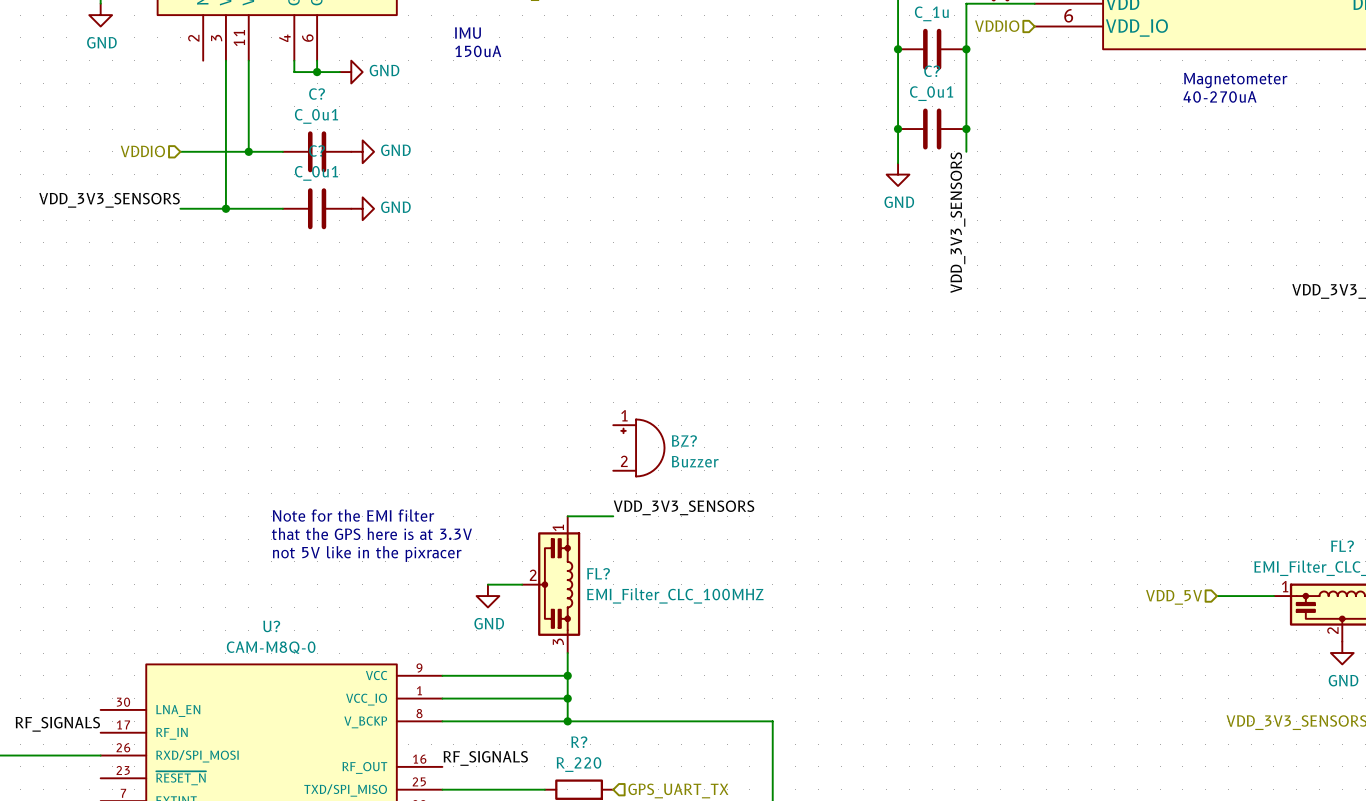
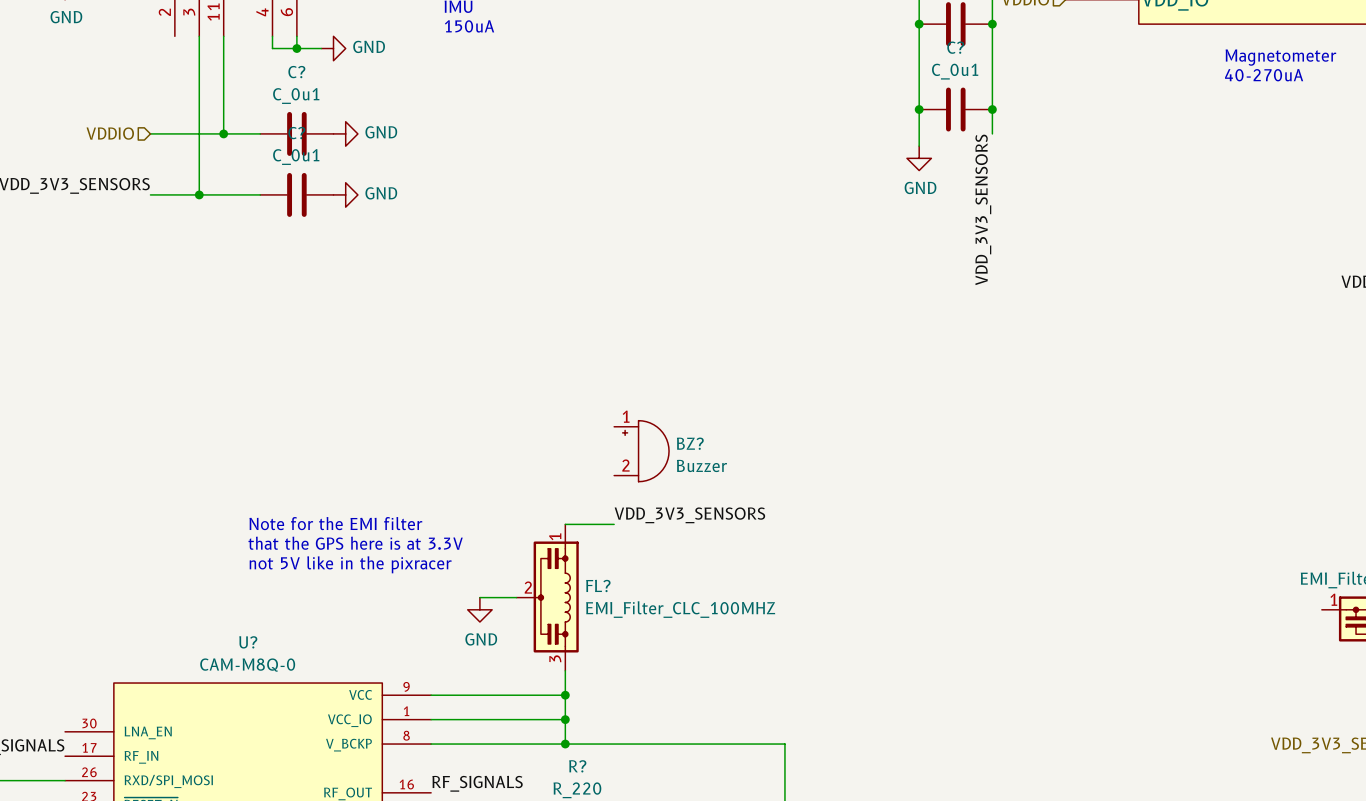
wire: (1216, 596) (1273, 596) -> none
hierarchical label: VDD_5V (1174, 597) -> none

